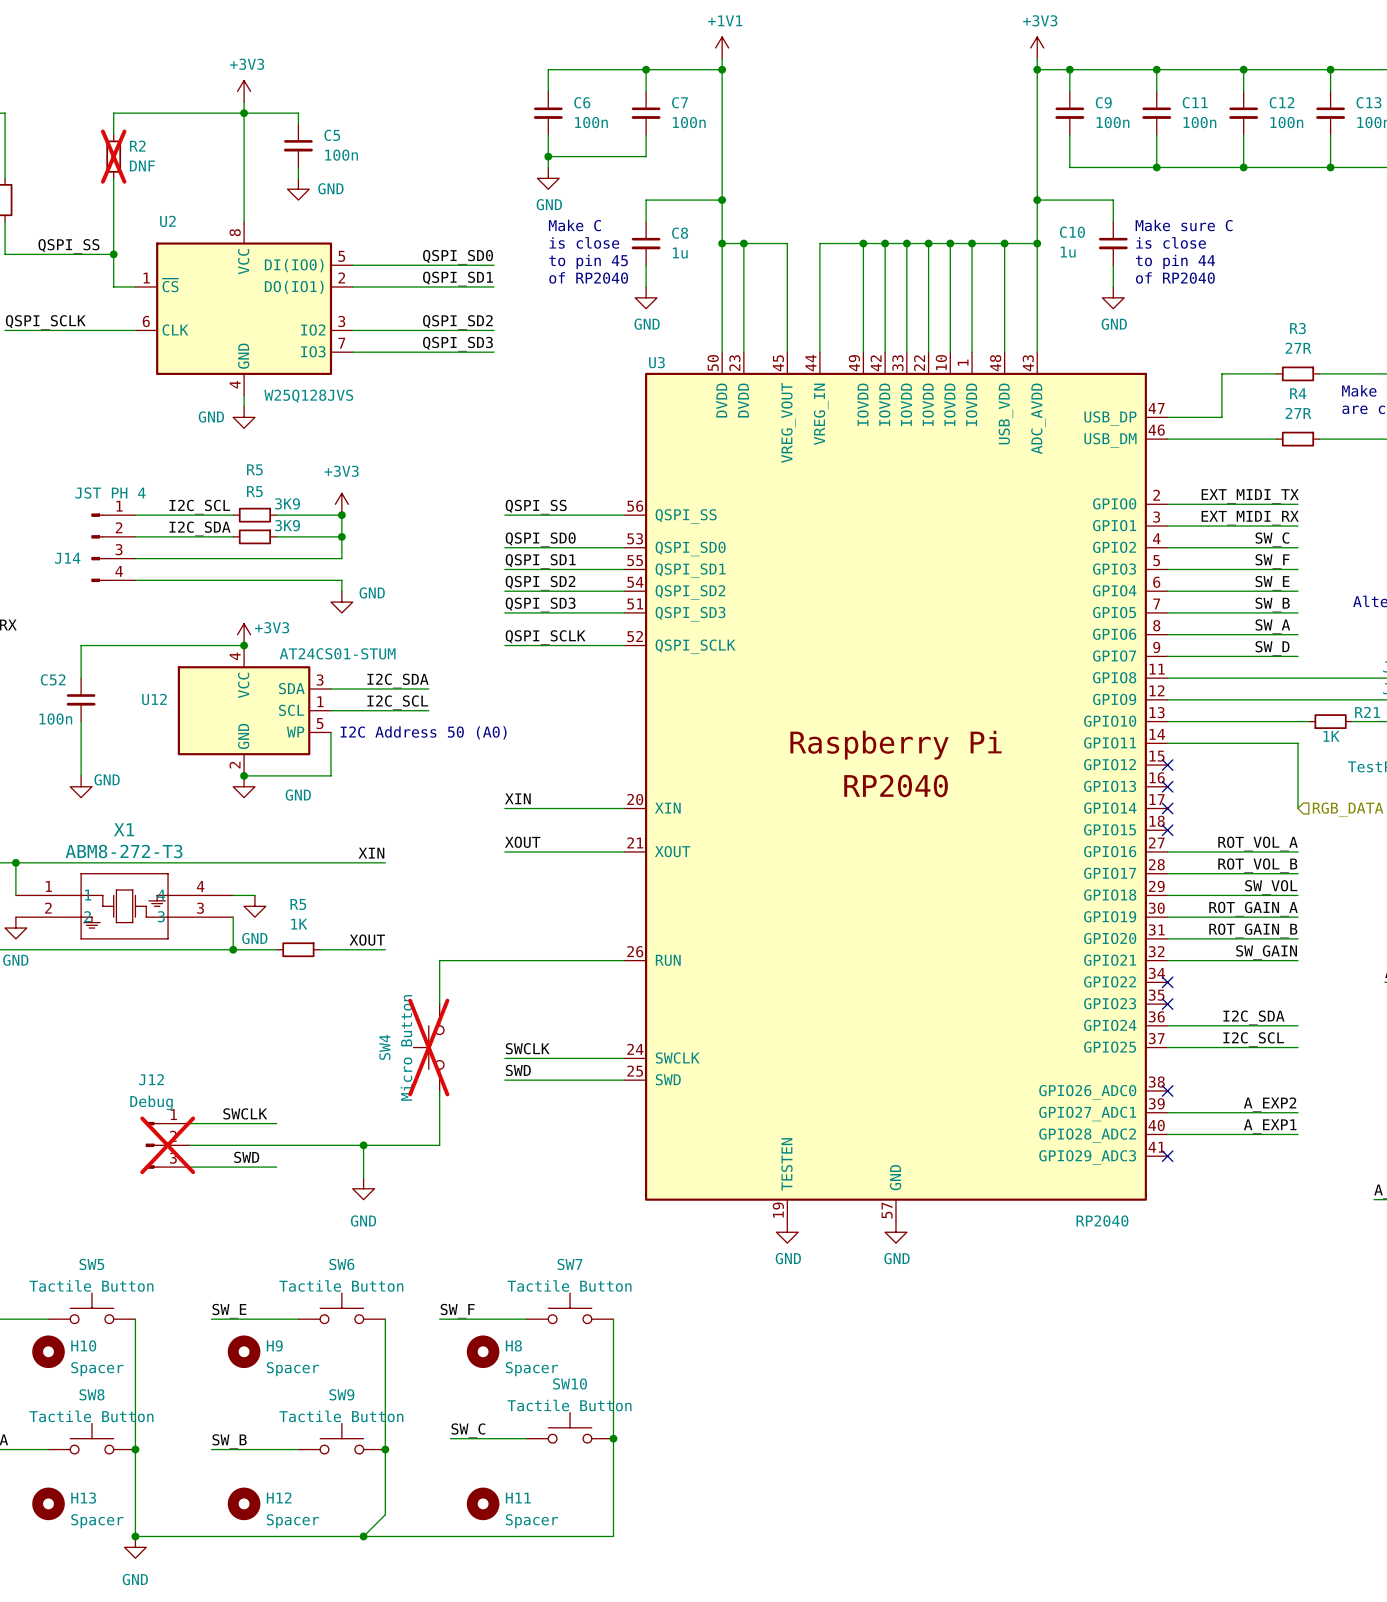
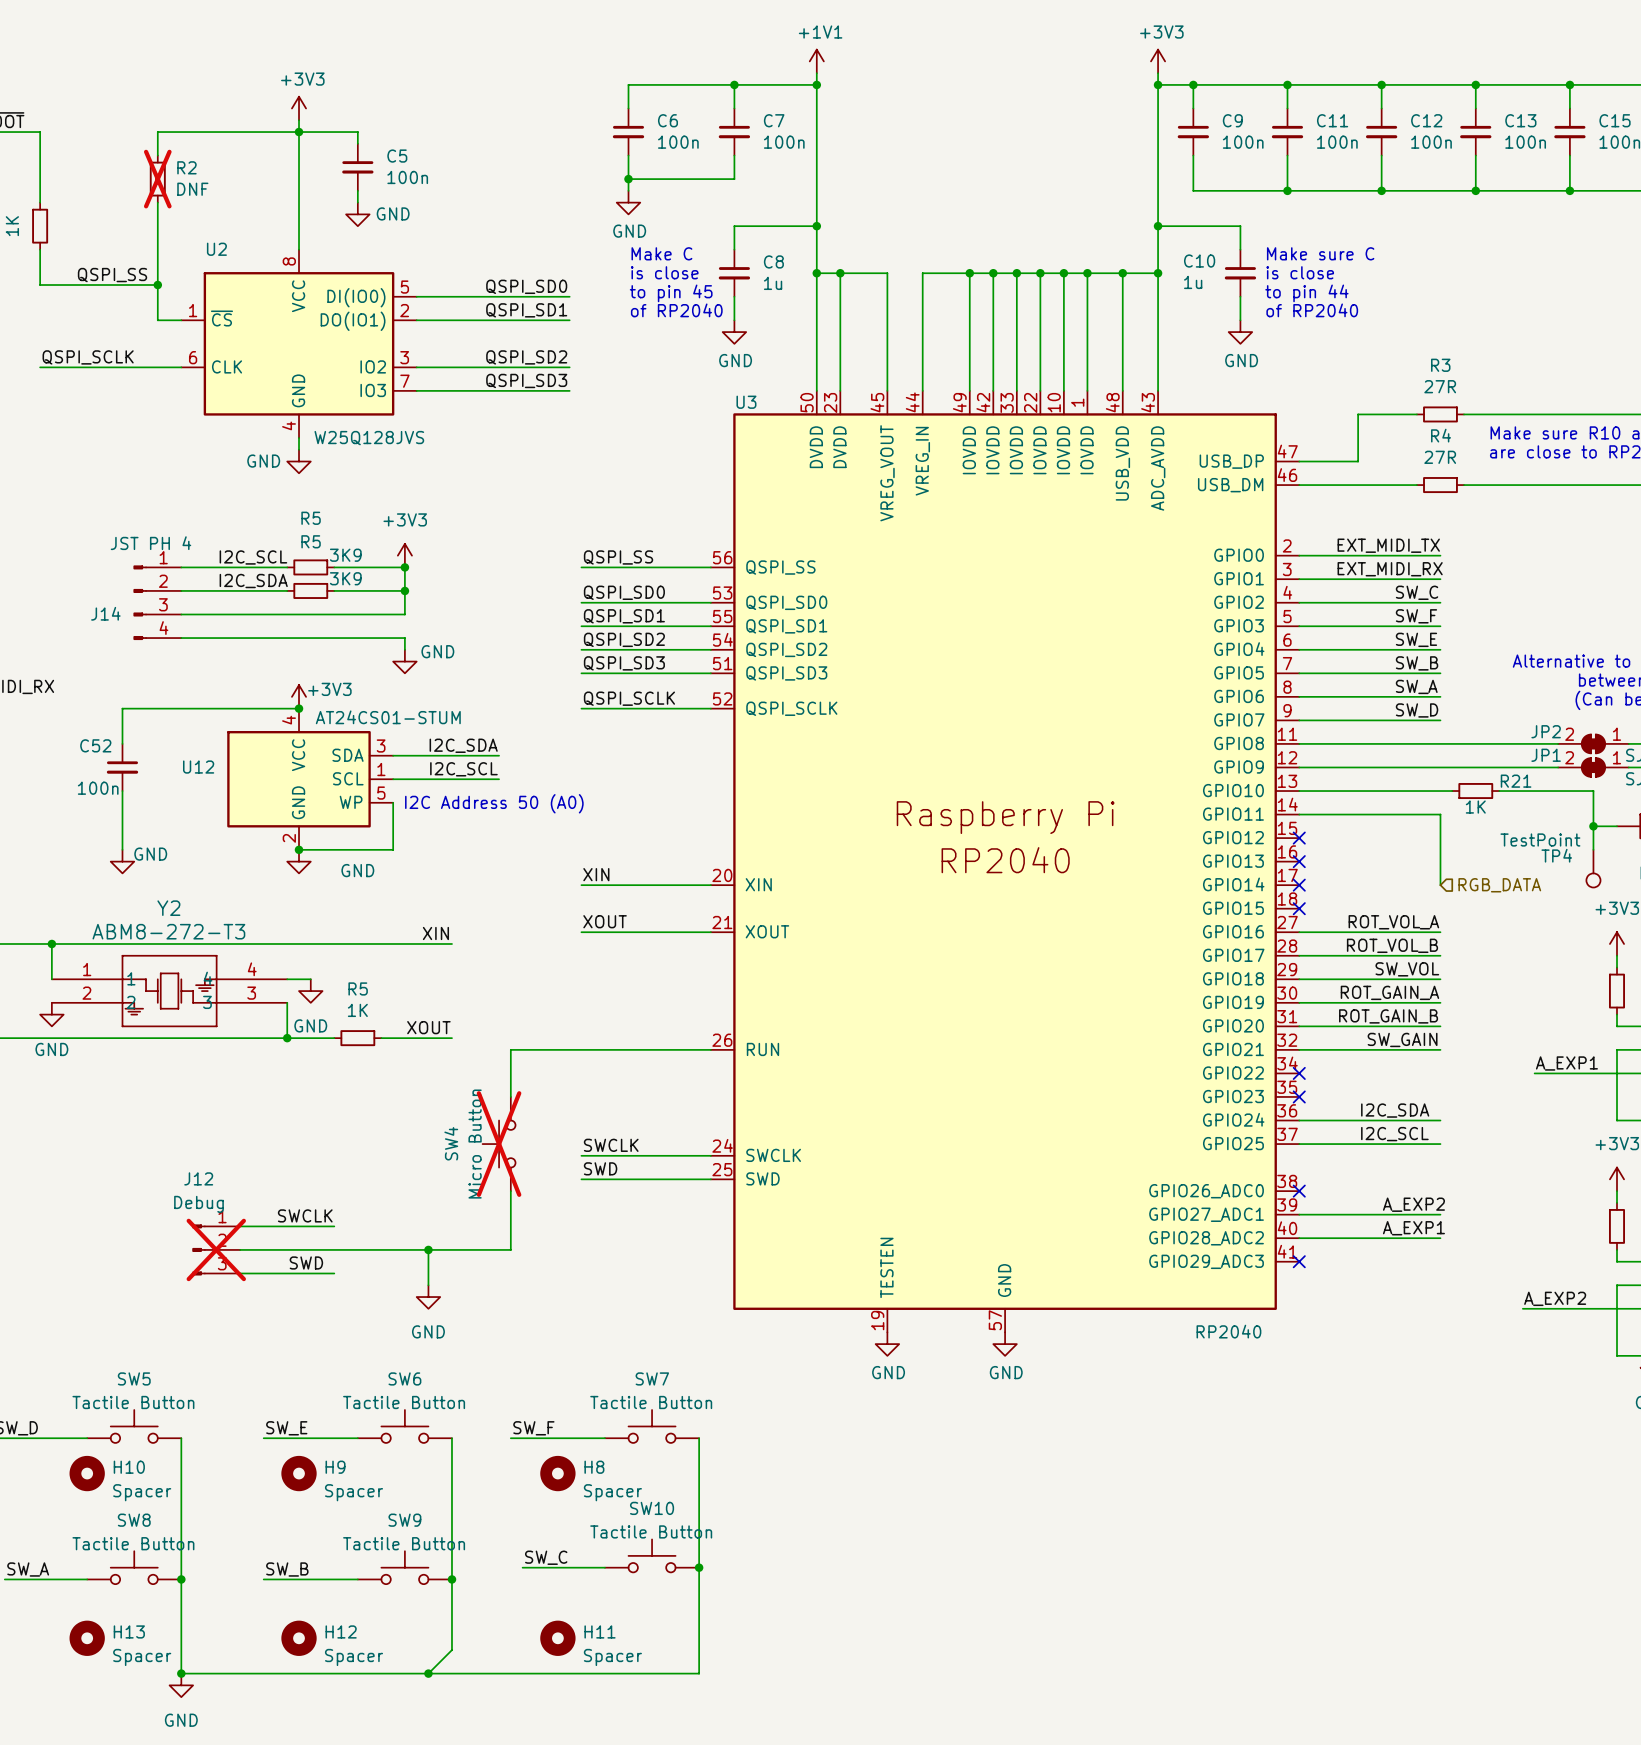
X1 name: X1 (124, 829) -> Y2 (168, 908)

